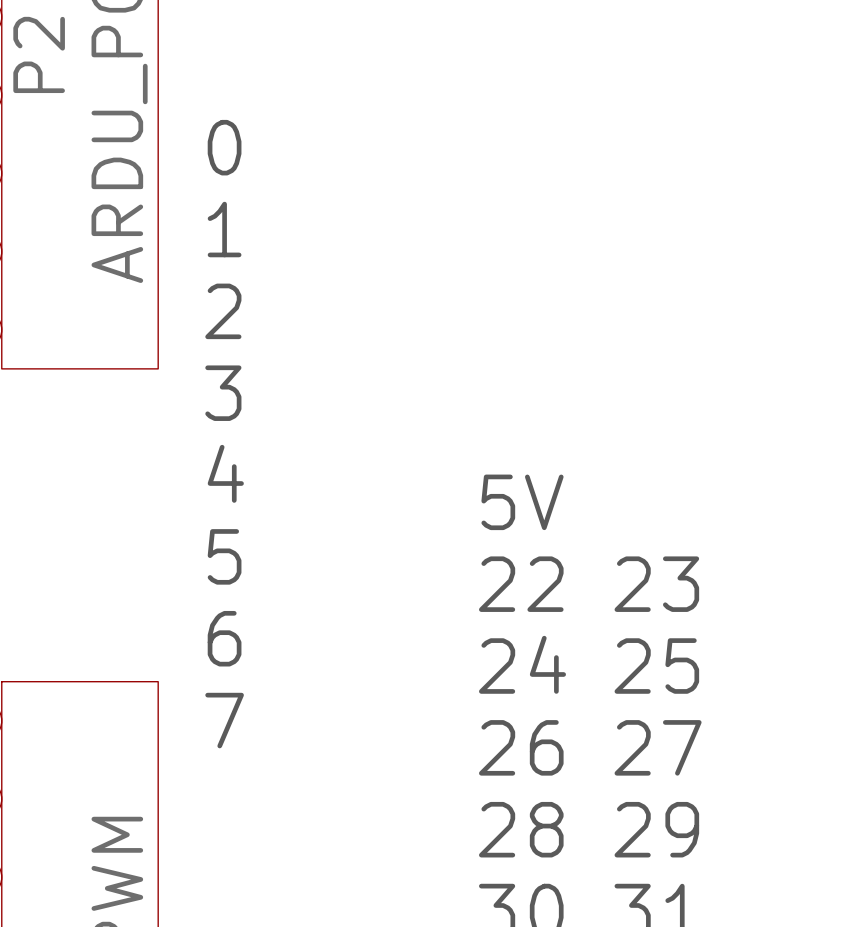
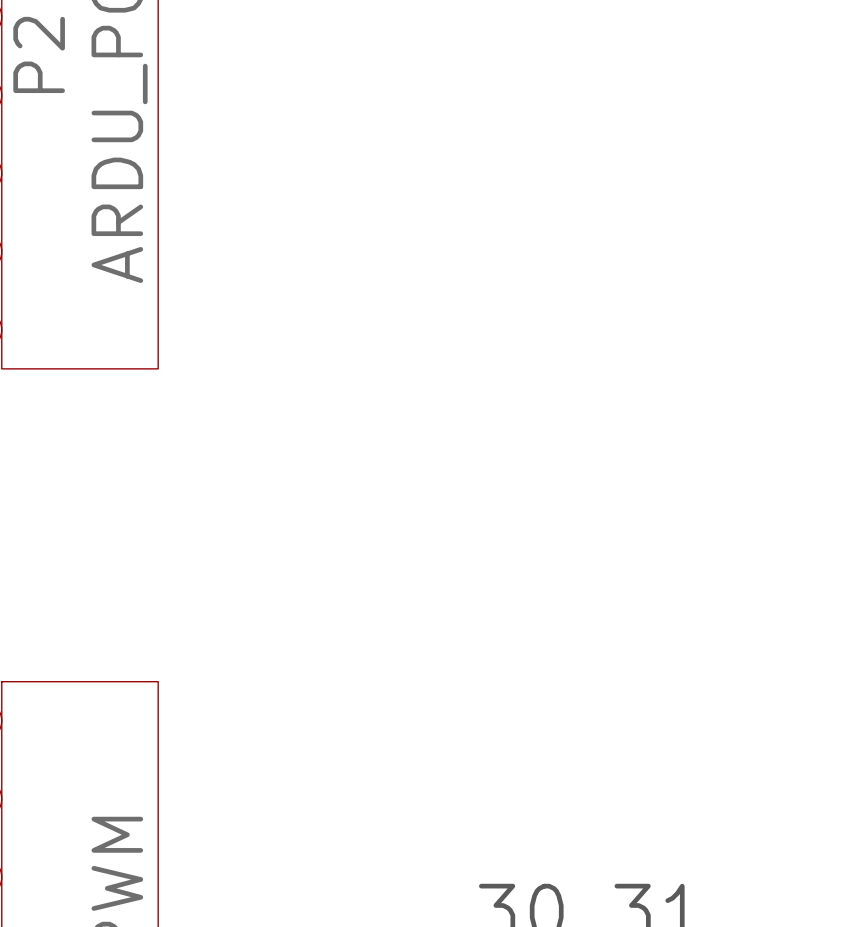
text: 0 (224, 147) -> none
text: 1 (224, 229) -> none
text: 2 (223, 311) -> none
text: 3 (223, 393) -> none
text: 4 (225, 473) -> none
text: 5V (522, 502) -> none
text: 5 (224, 556) -> none
text: 22 23 (589, 584) -> none
text: 6 (224, 638) -> none
text: 24 25 (589, 664) -> none
text: 7 (224, 720) -> none
text: 26 27 (590, 747) -> none
text: 28 29 (589, 829) -> none

